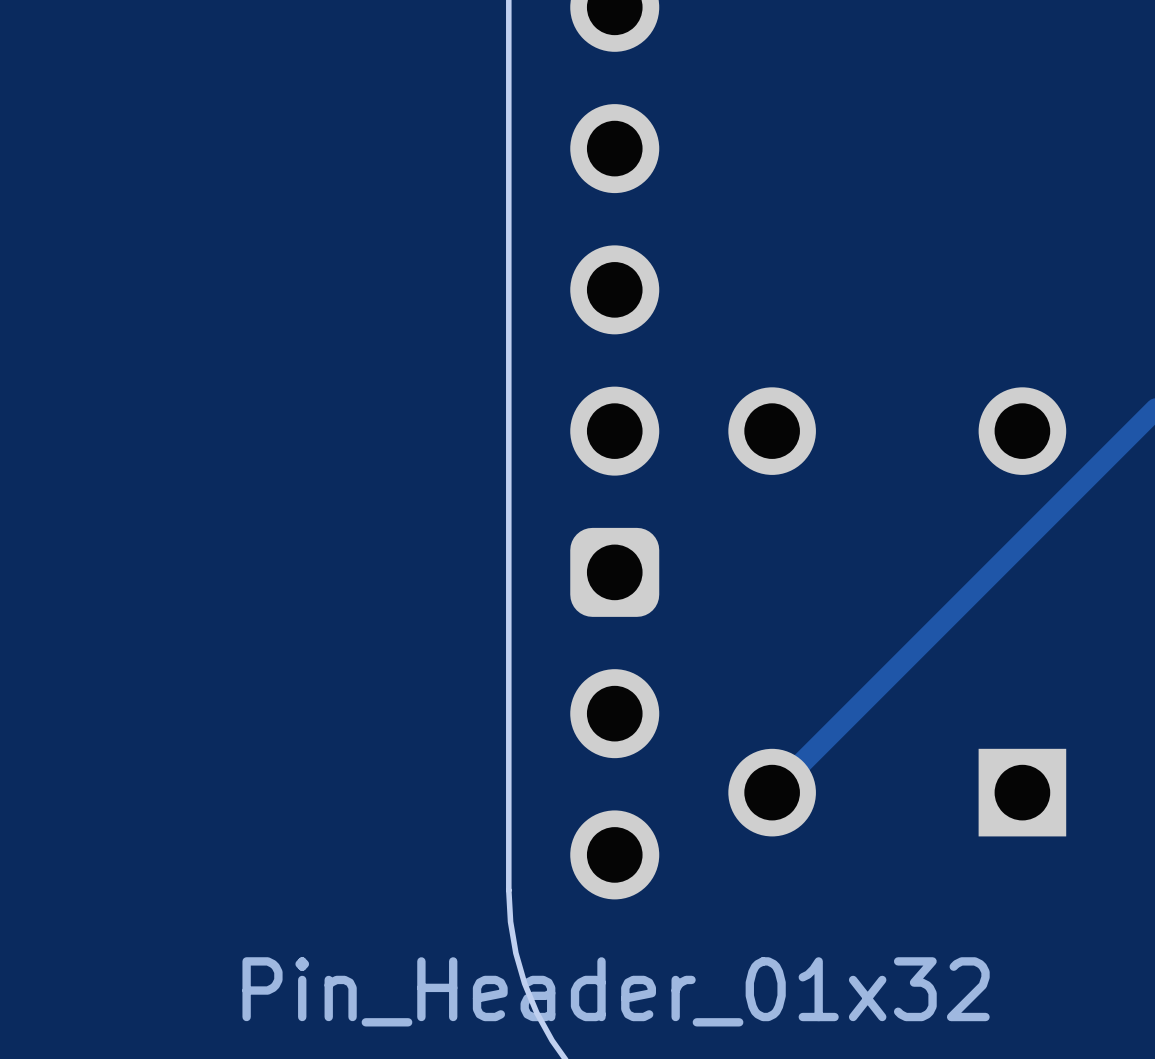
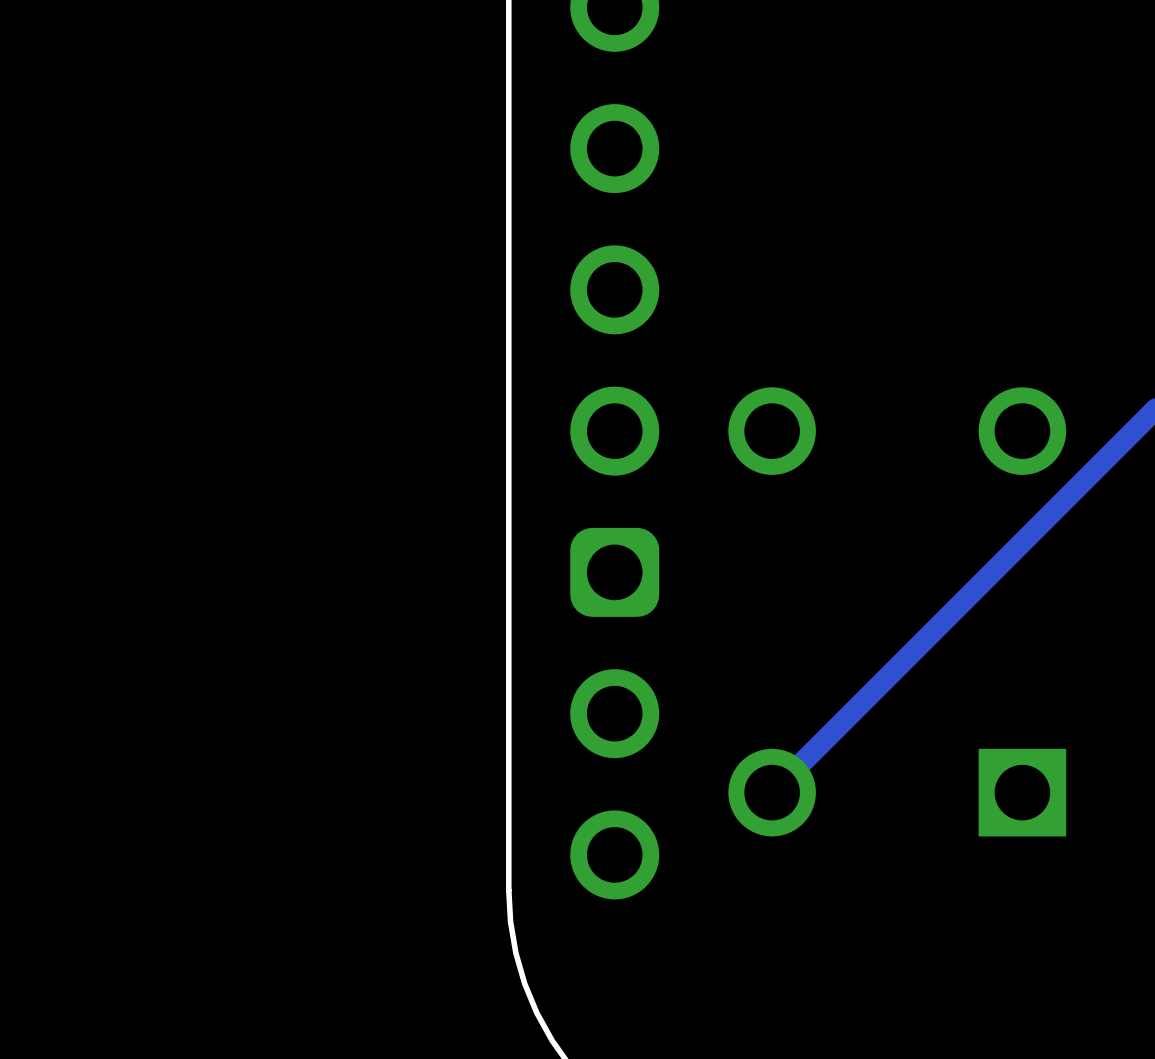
drawing: [242, 957, 990, 1027] -> none

